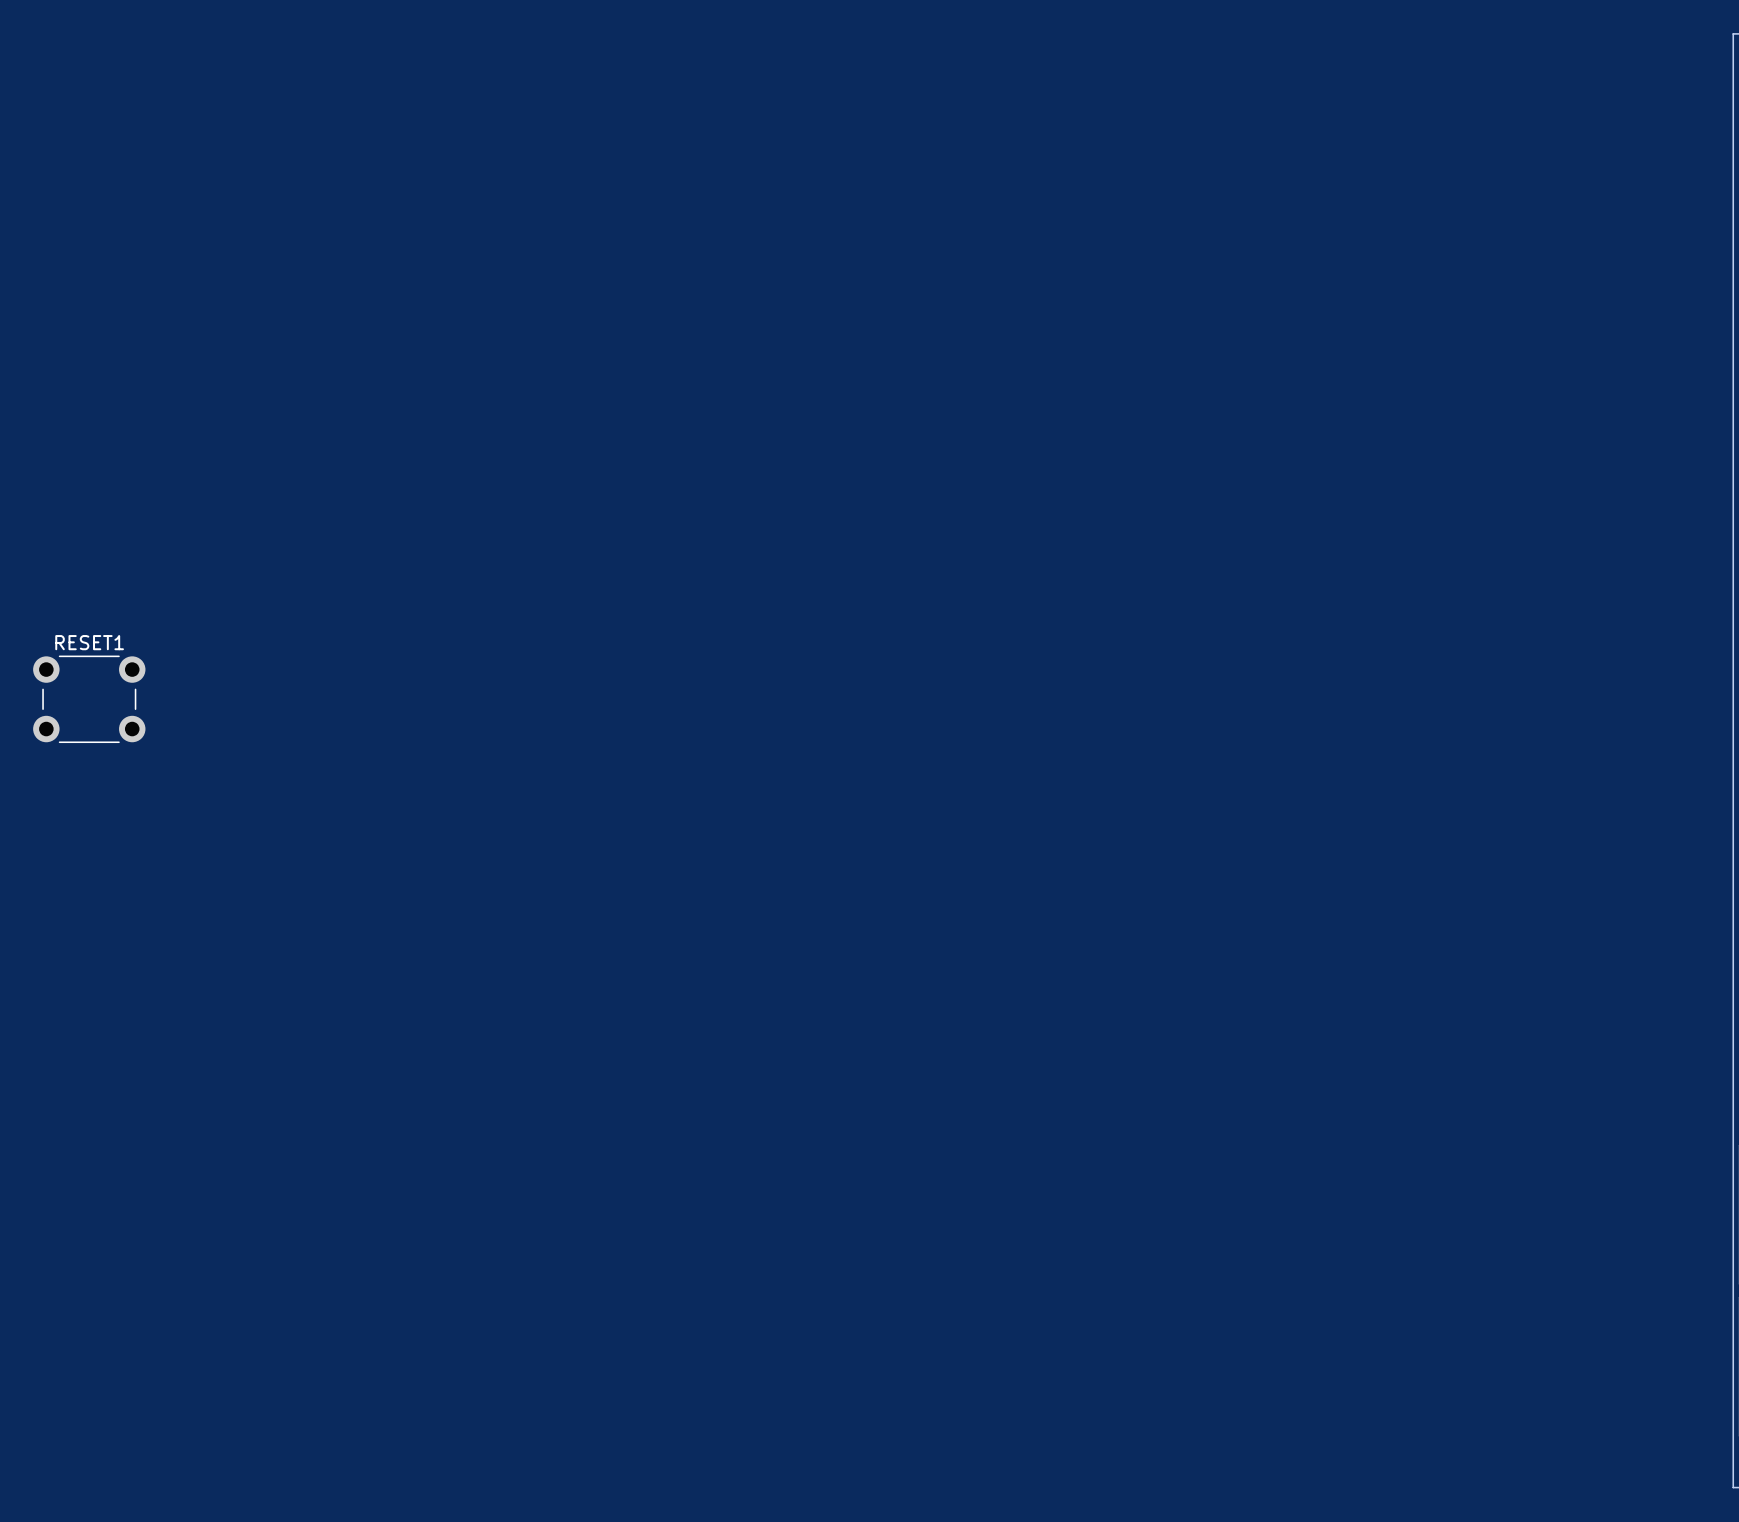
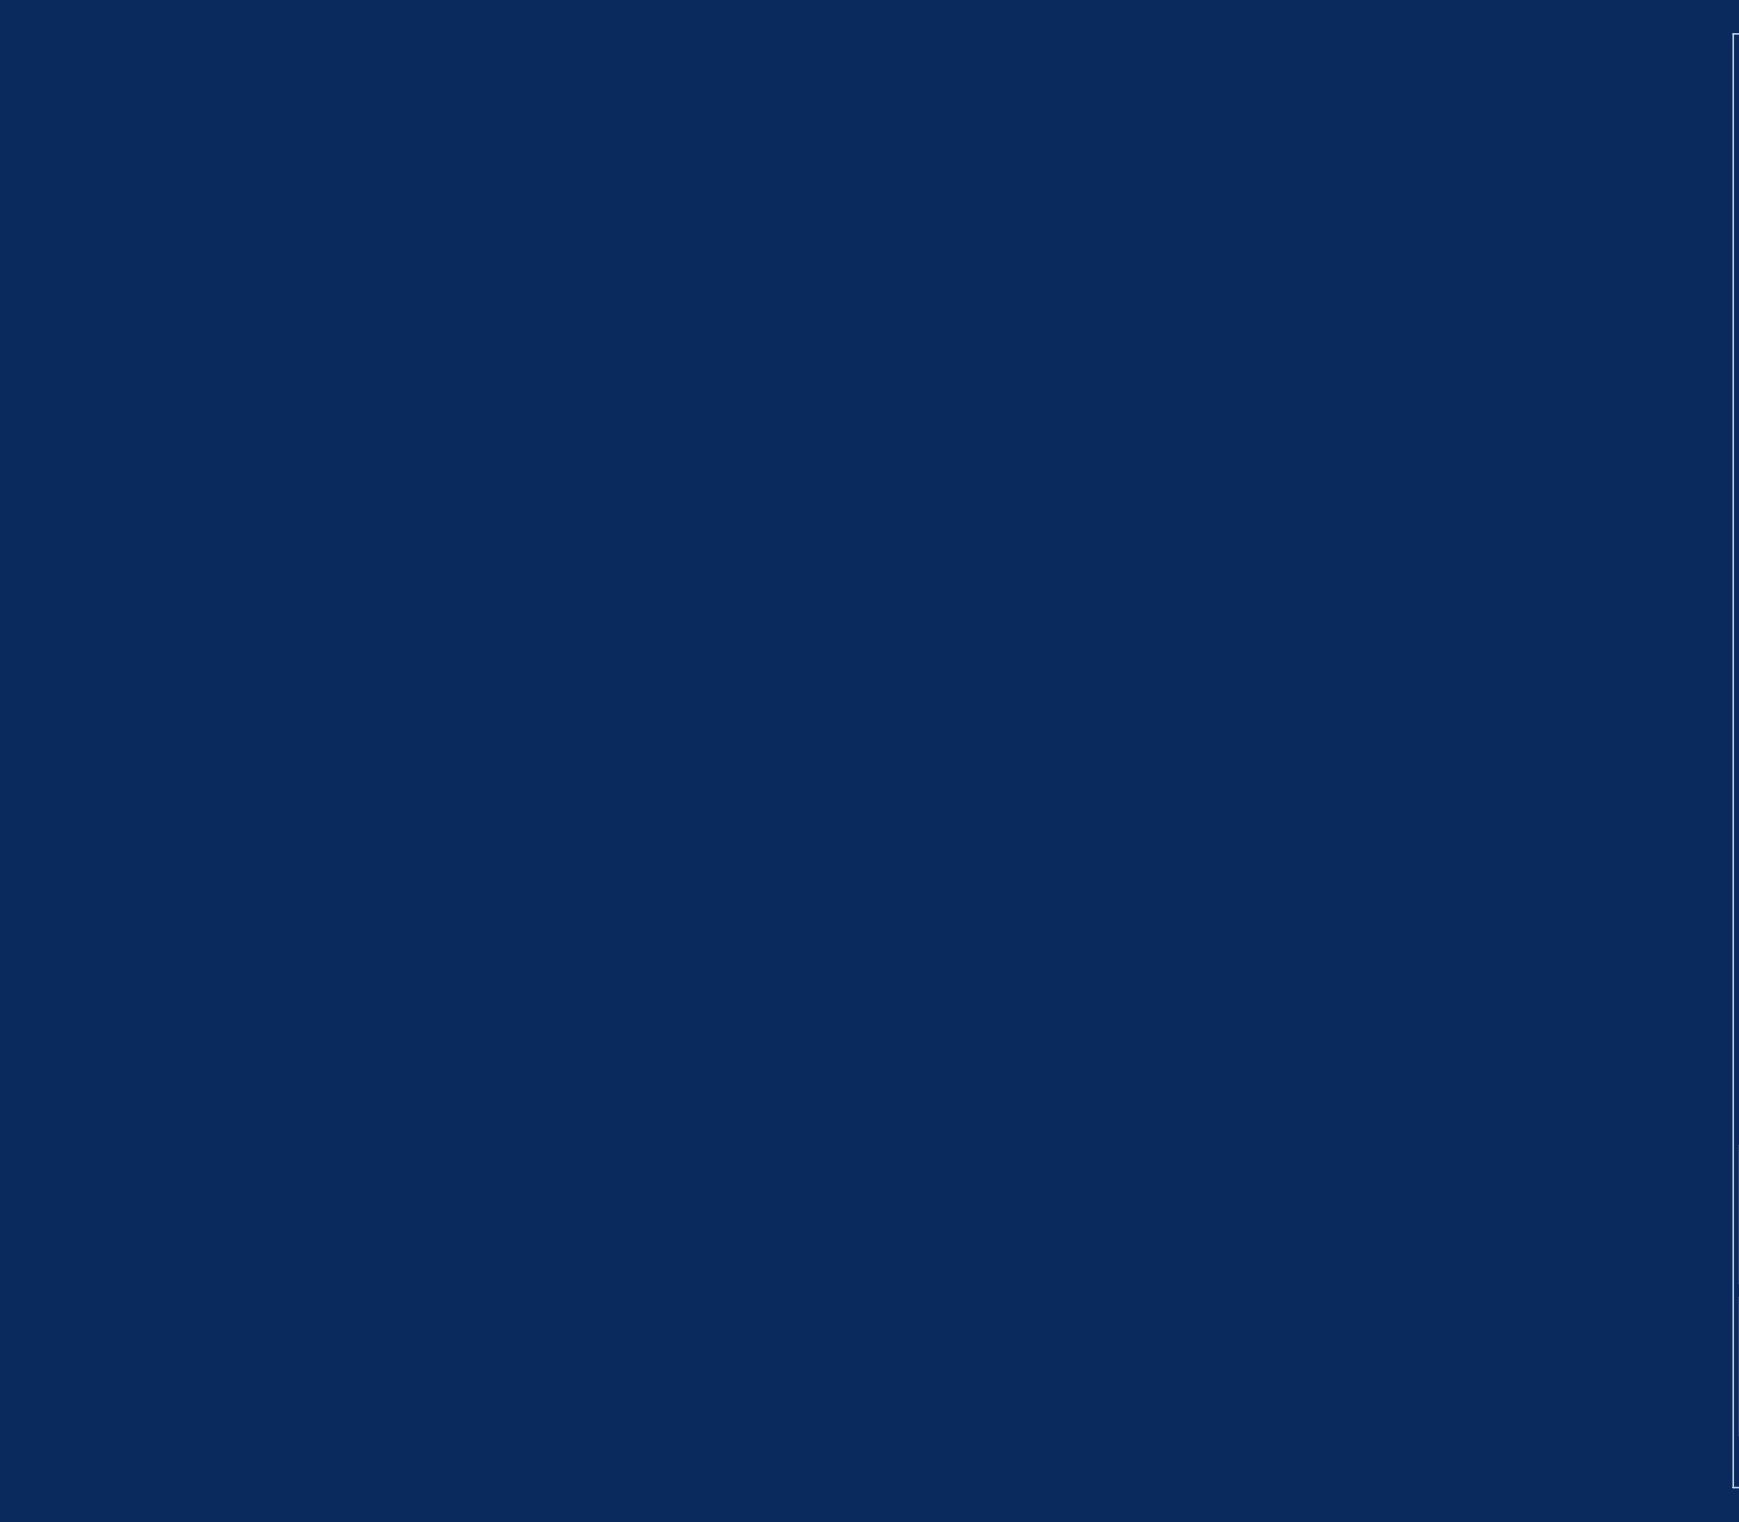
RESET1: (89, 699) -> none

